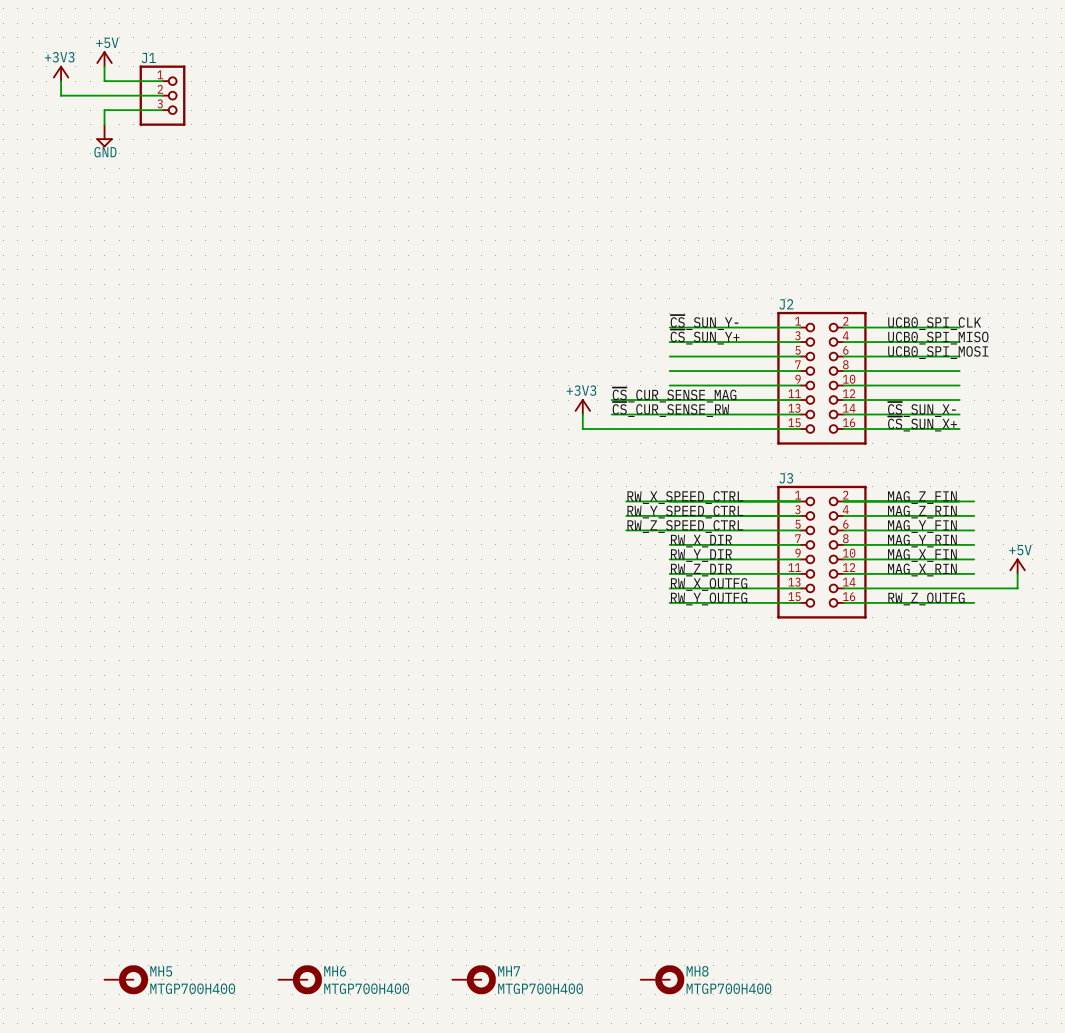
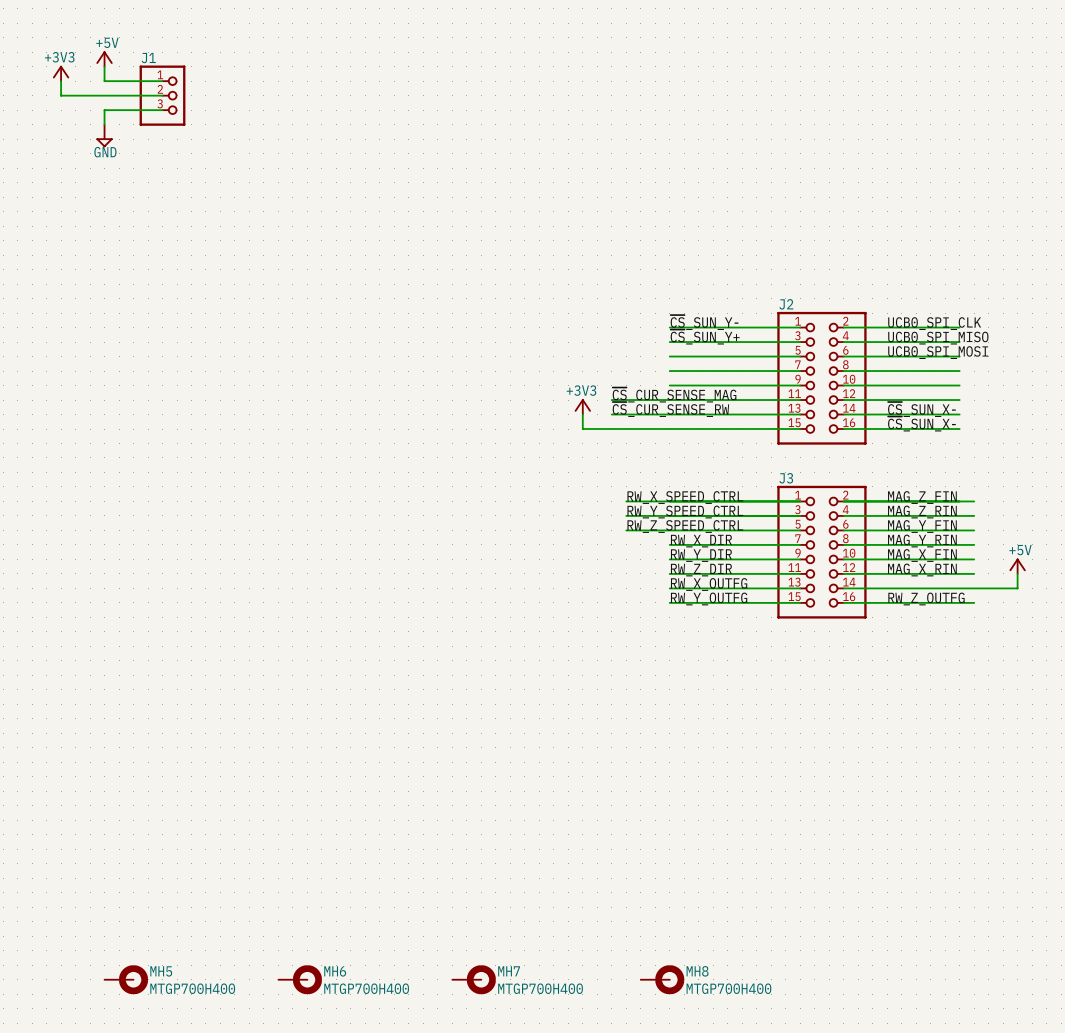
label: ~{CS}_SUN_X+ (922, 423) -> ~{CS}_SUN_X- (921, 423)

